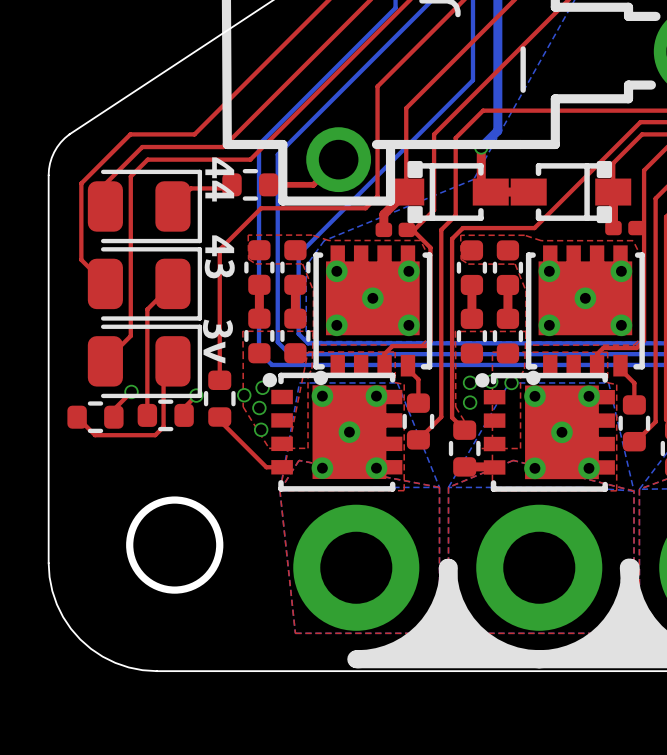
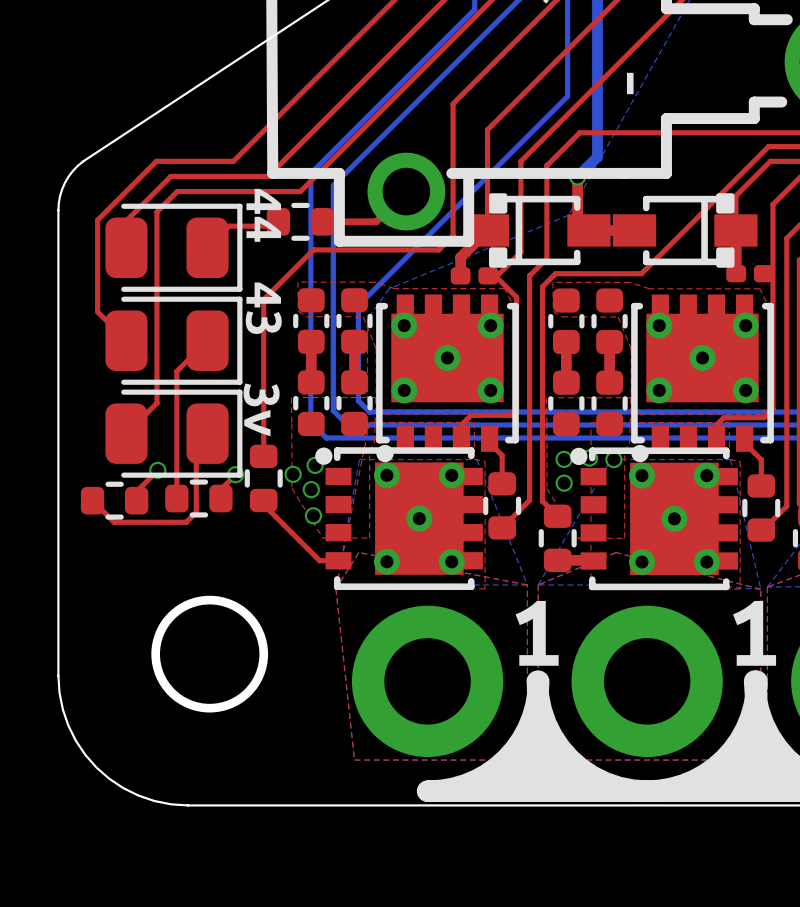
drawing: none -> [515, 600, 559, 666]
drawing: none -> [733, 600, 777, 666]

